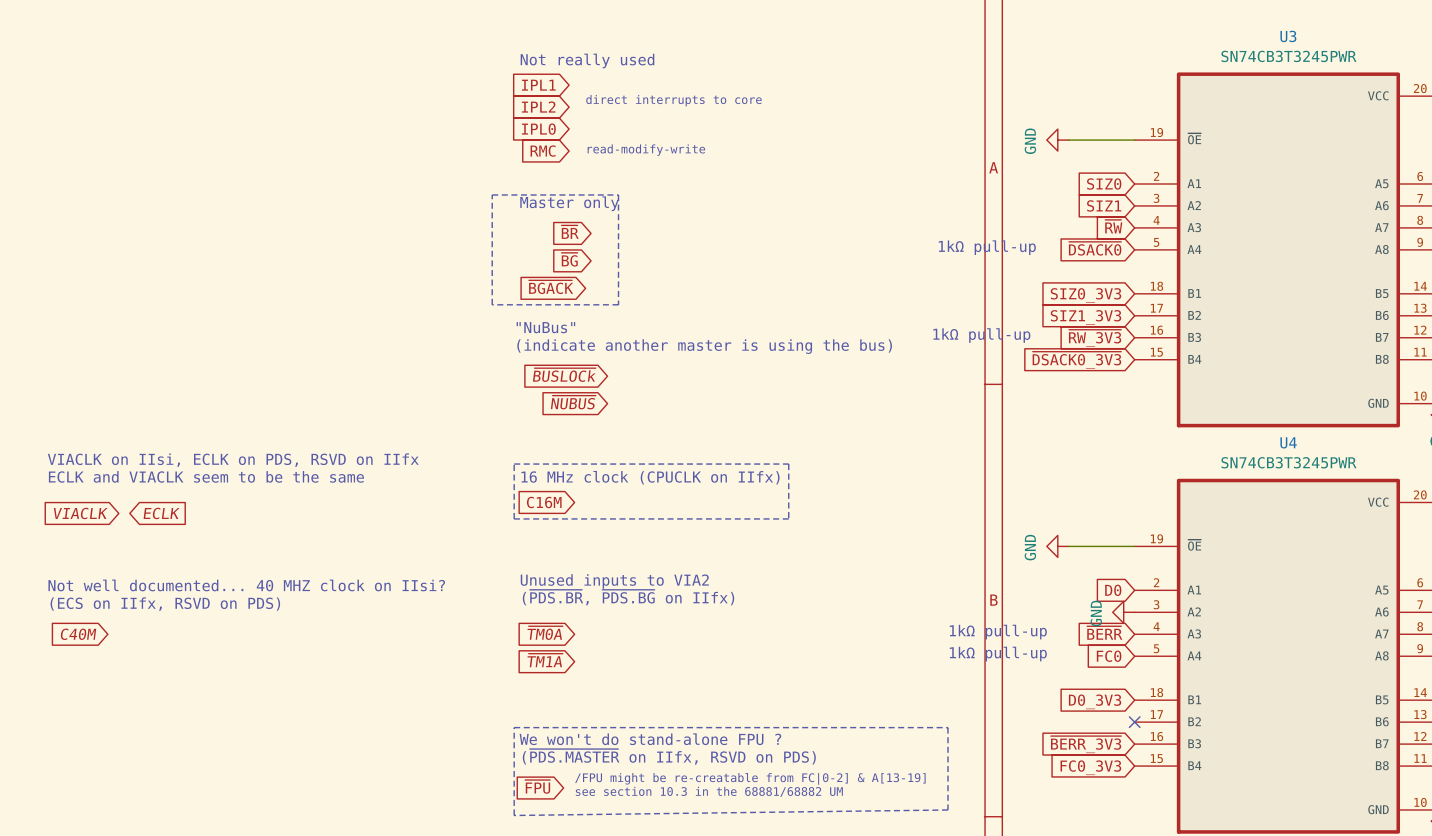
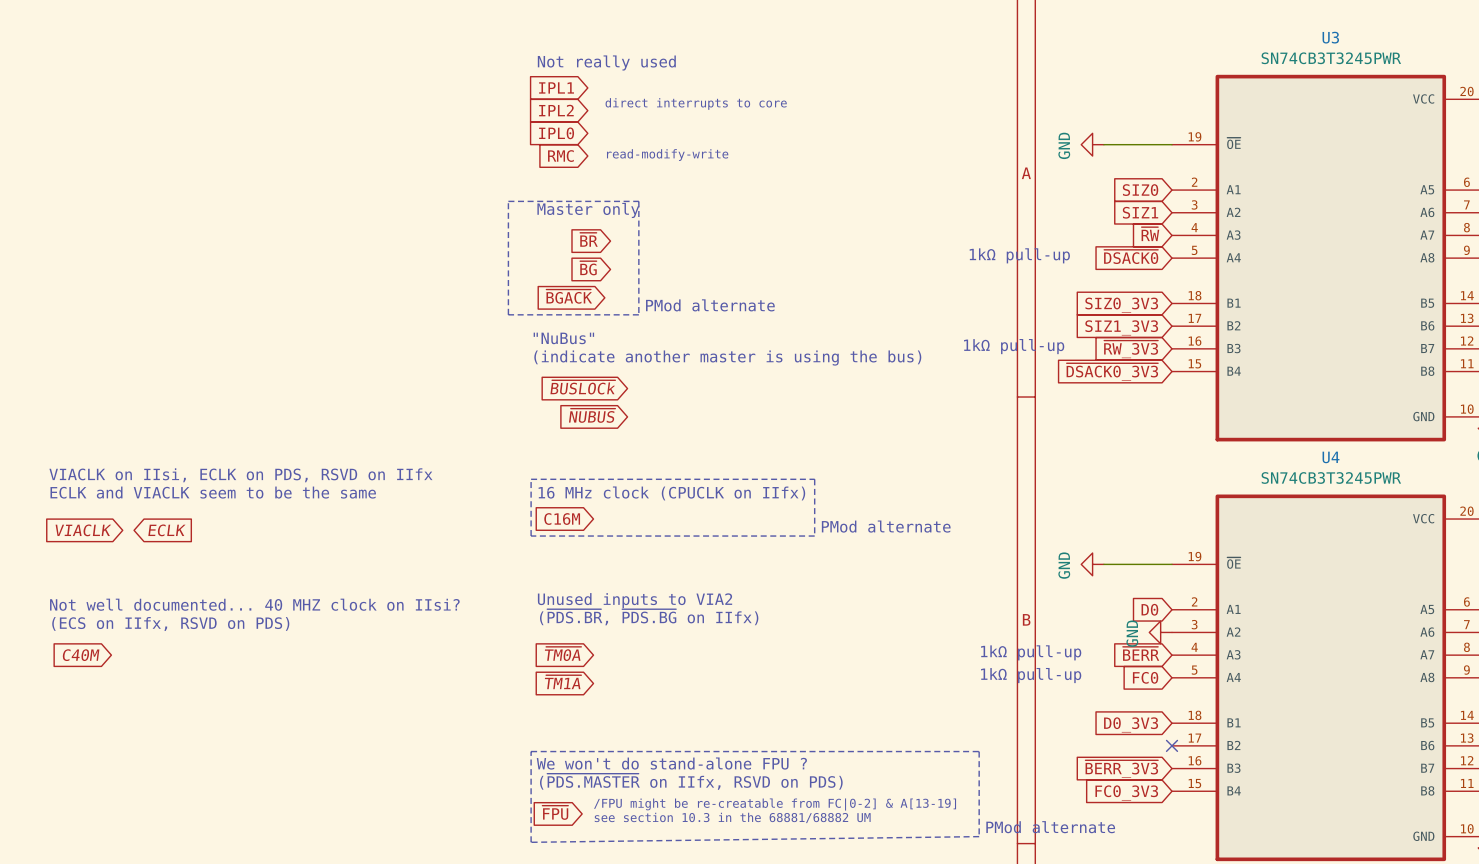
text: none -> PMod alternate (710, 305)
text: none -> PMod alternate (886, 526)
text: none -> PMod alternate (1050, 827)

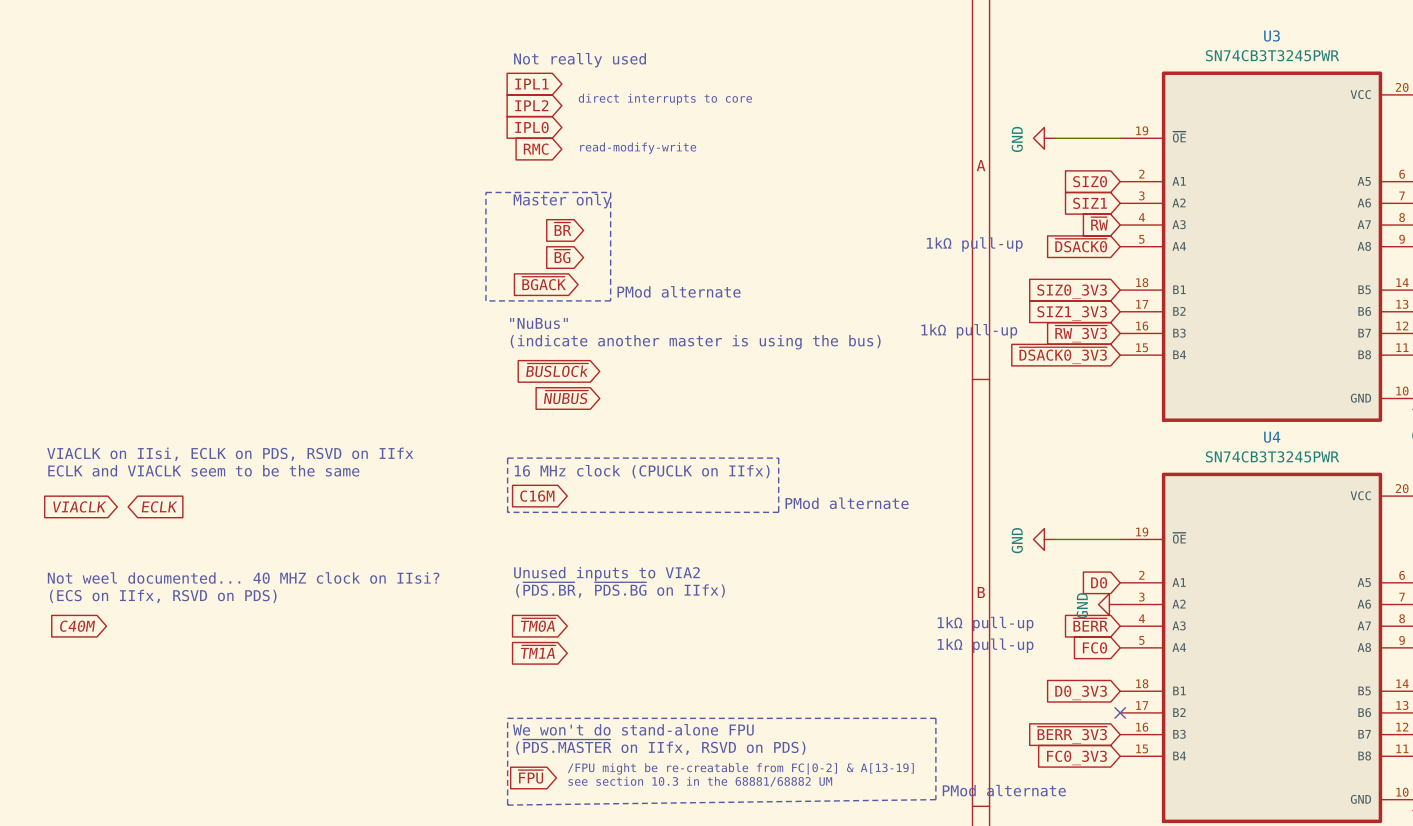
text: Not well documented... 40 MHZ clock on IIsi? (254, 604) -> Not weel documented... 40 MHZ clock on IIsi? (243, 578)
text: We won't do stand-alone FPU ? (671, 763) -> We won't do stand-alone FPU (633, 729)

